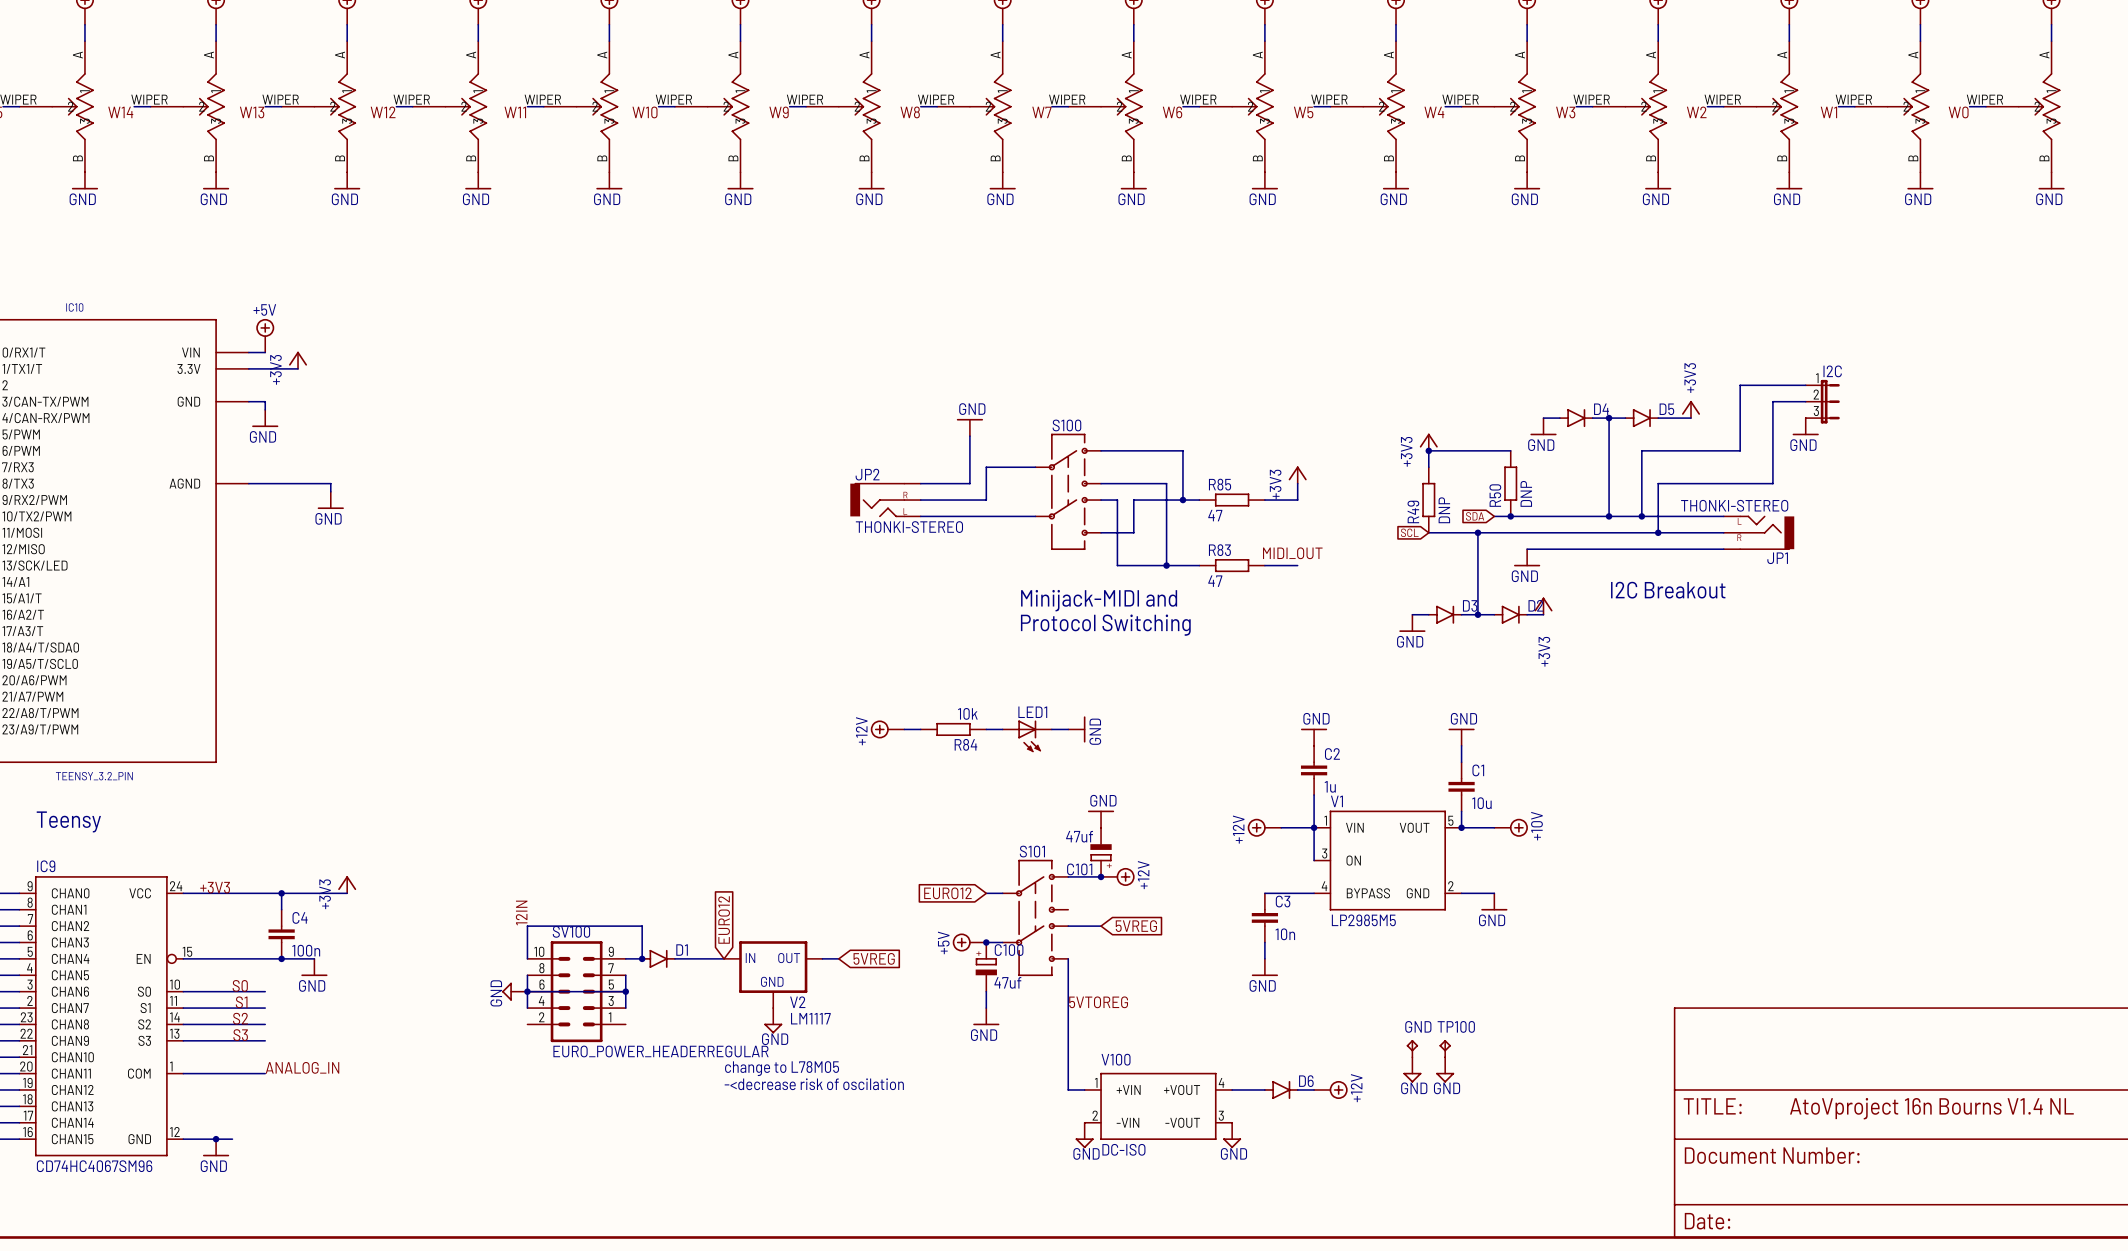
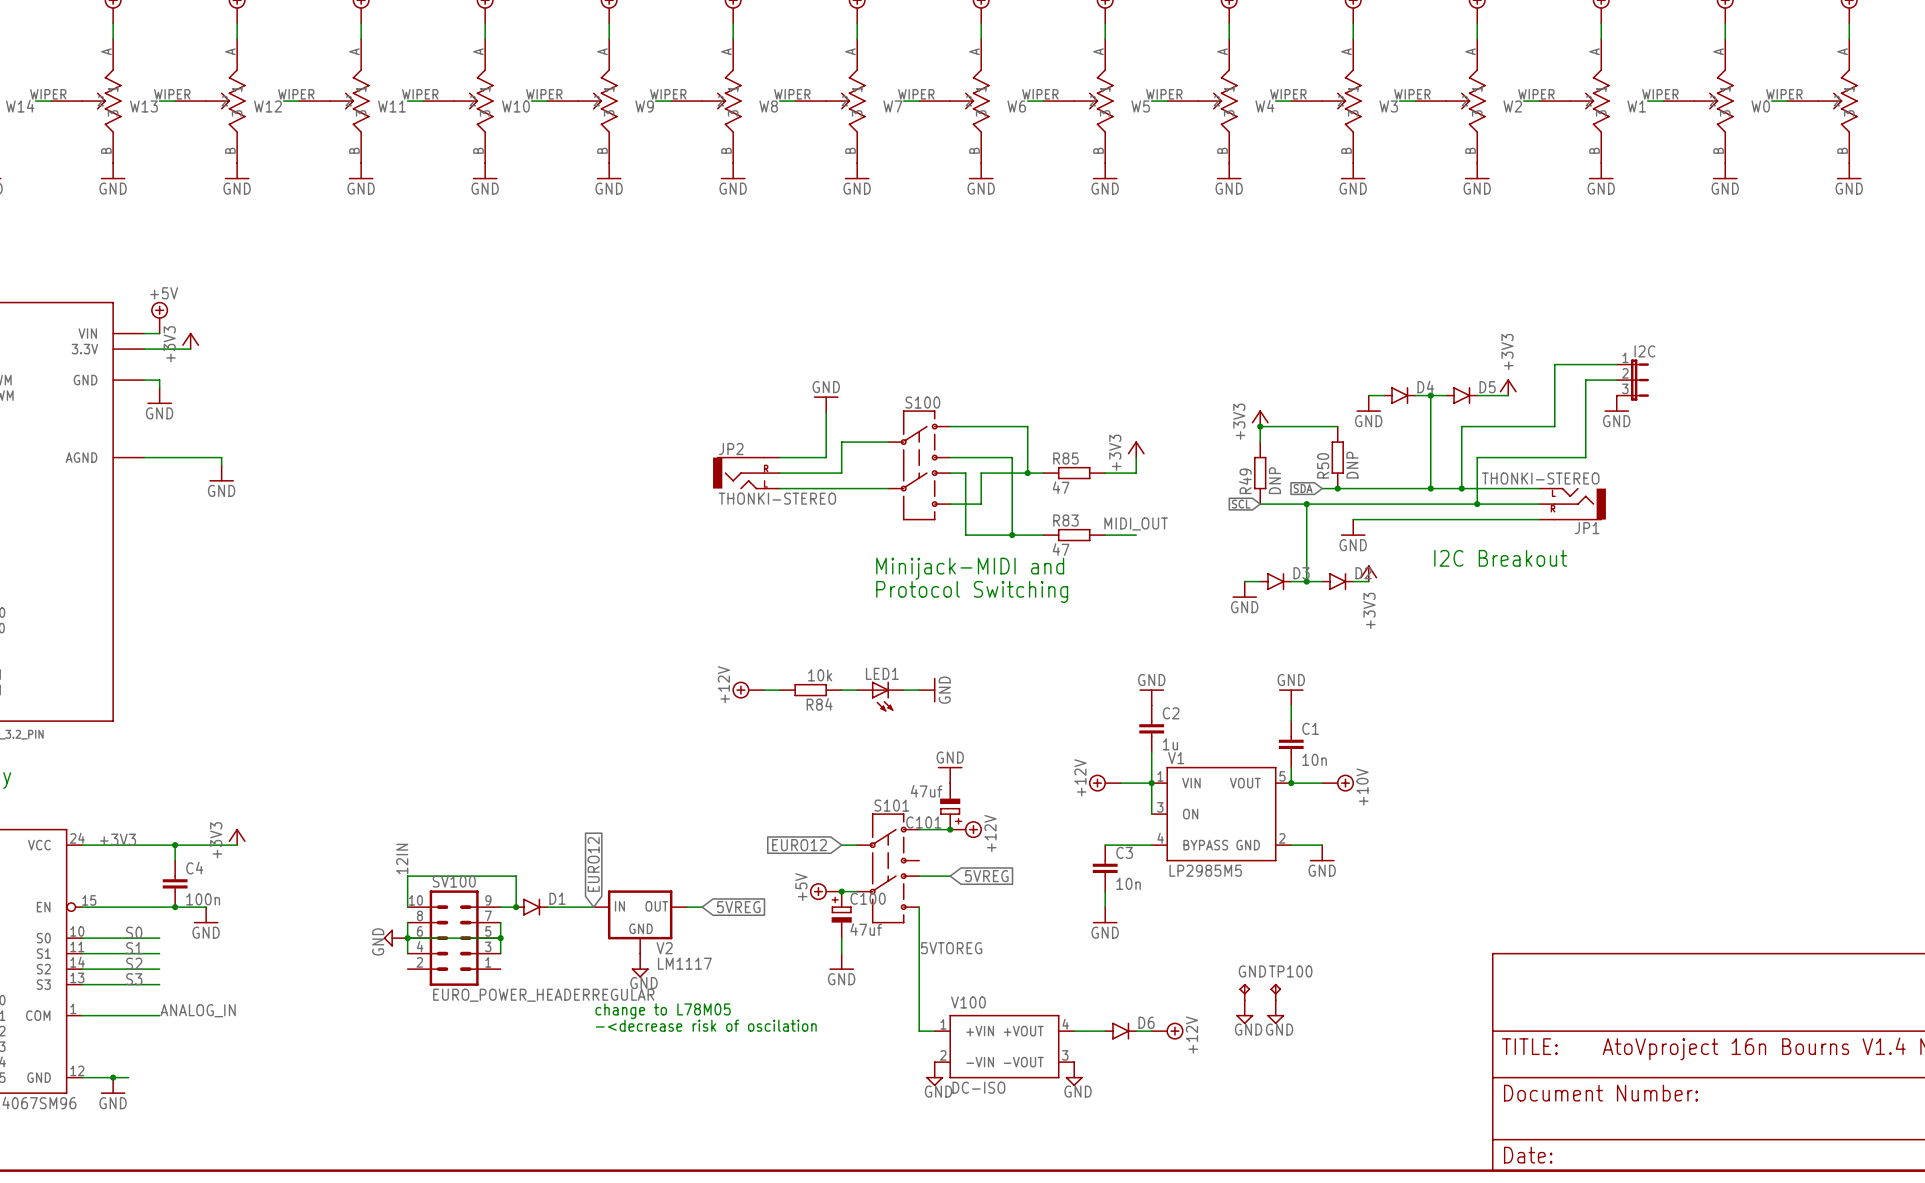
C1 value: 10u (1481, 803) -> 10n (1314, 759)

